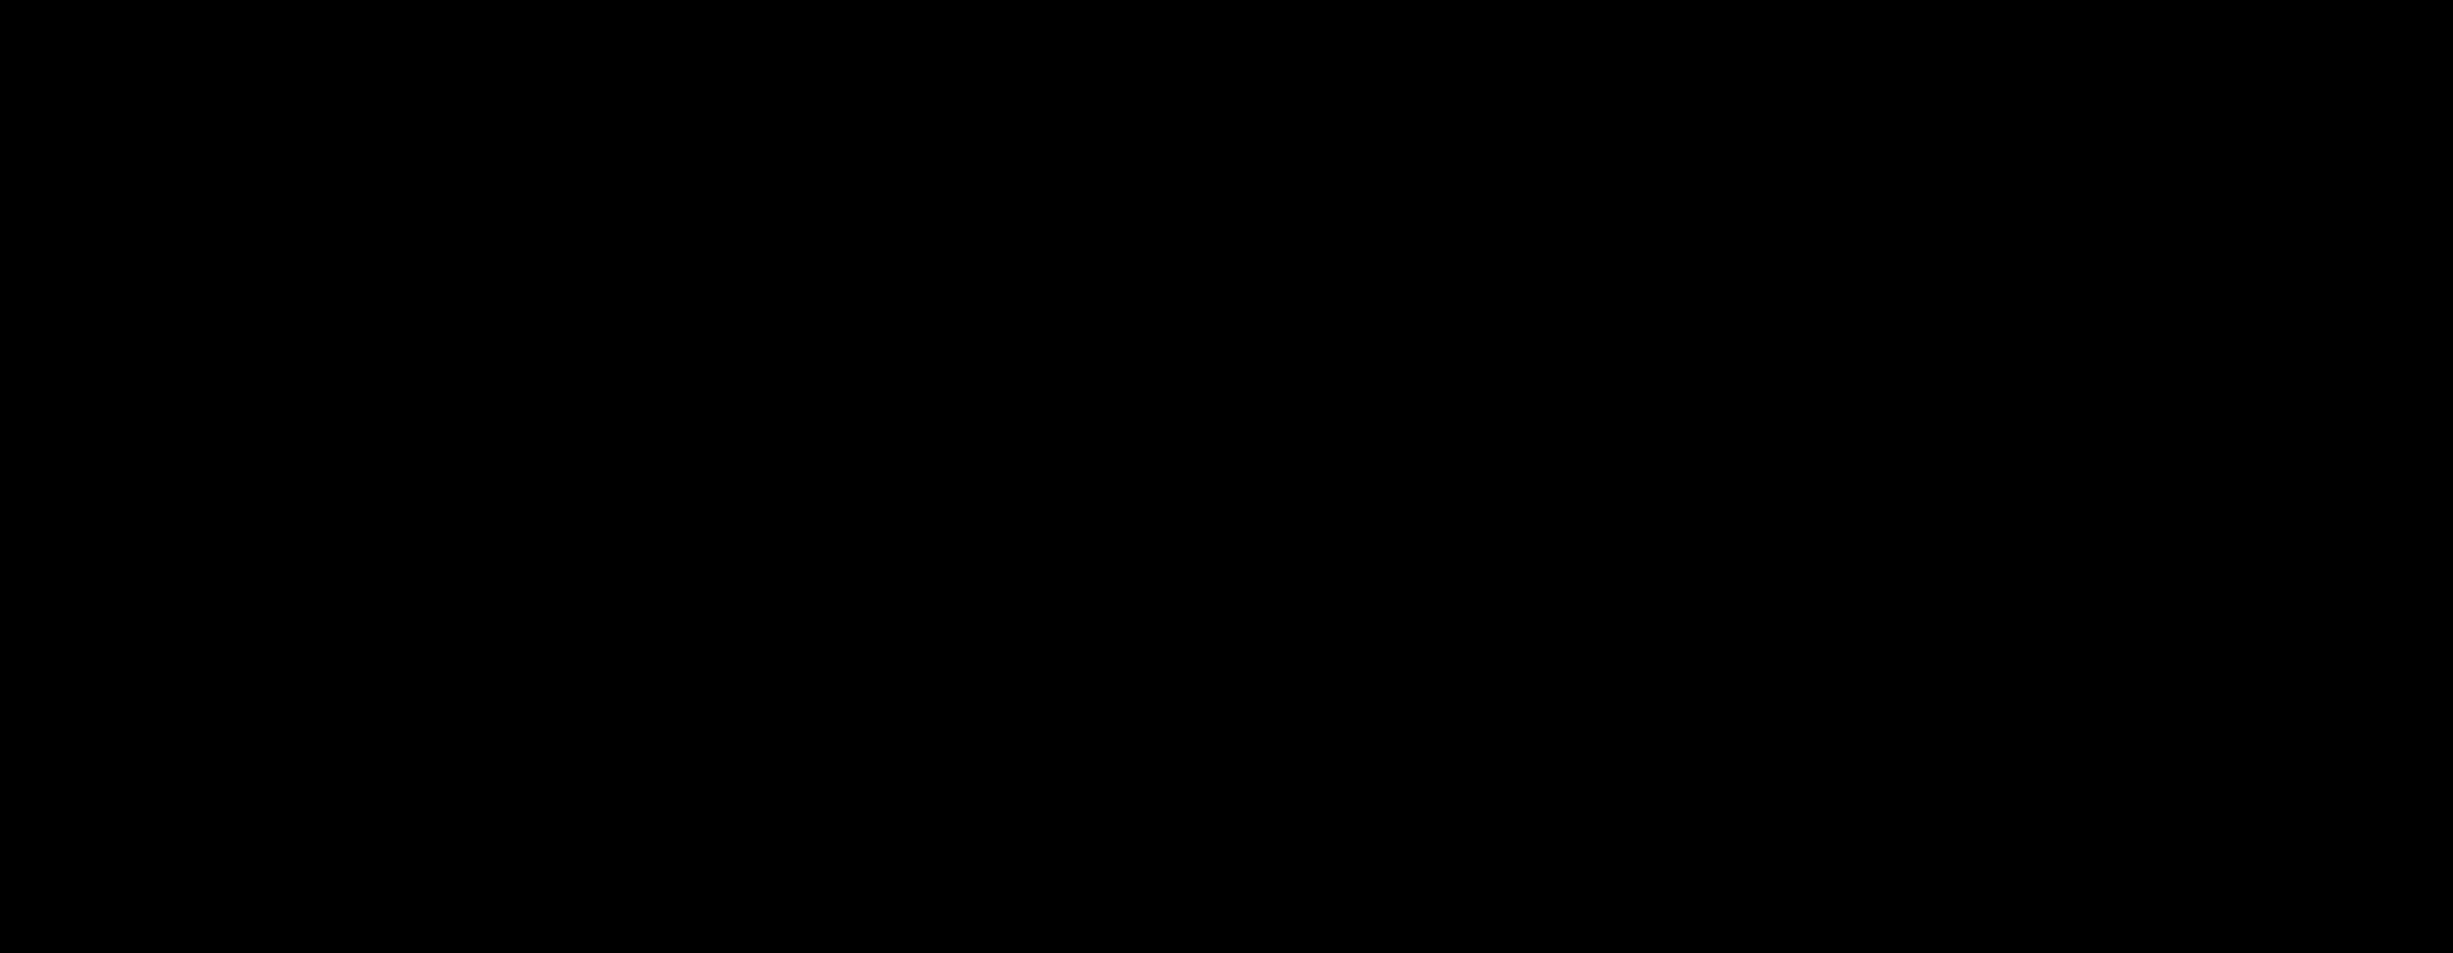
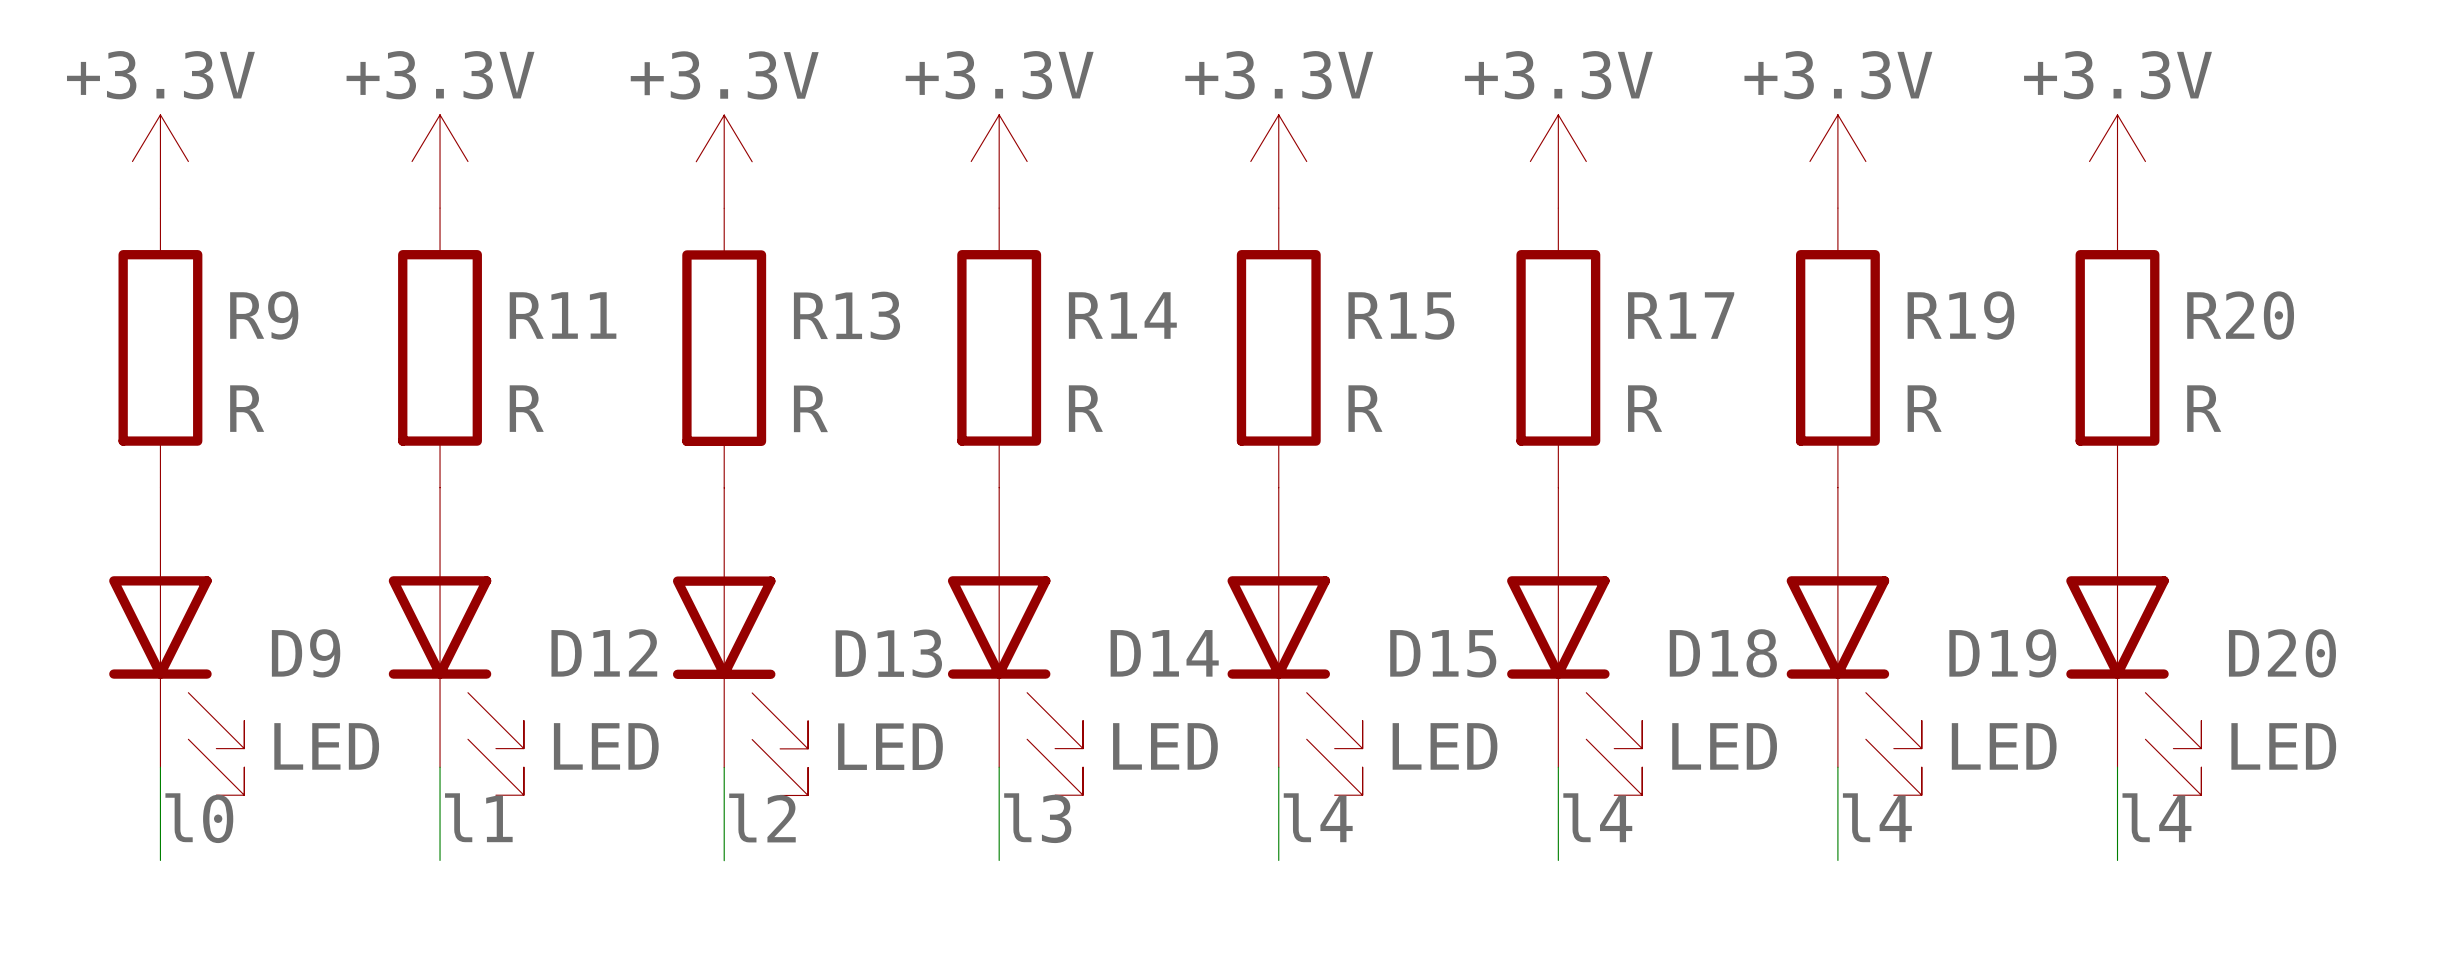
power symbol: none -> +3.3V (160, 161)
power symbol: none -> +3.3V (440, 161)
power symbol: none -> +3.3V (724, 161)
power symbol: none -> +3.3V (999, 161)
power symbol: none -> +3.3V (1278, 161)
power symbol: none -> +3.3V (1558, 161)
power symbol: none -> +3.3V (1837, 161)
power symbol: none -> +3.3V (2117, 161)
R9: none -> R (160, 347)
R11: none -> R (440, 347)
R14: none -> R (999, 347)
R15: none -> R (1278, 347)
R17: none -> R (1558, 347)
R19: none -> R (1837, 347)
R20: none -> R (2117, 347)
R13: none -> R (724, 348)
D9: none -> LED (176, 641)
D12: none -> LED (456, 641)
D13: none -> LED (740, 641)
D14: none -> LED (1015, 641)
D15: none -> LED (1295, 641)
D18: none -> LED (1574, 641)
D19: none -> LED (1854, 641)
D20: none -> LED (2133, 641)
wire: none -> (160, 767) (160, 860)
wire: none -> (440, 767) (440, 860)
wire: none -> (724, 767) (724, 860)
wire: none -> (999, 767) (999, 860)
wire: none -> (1278, 767) (1278, 860)
wire: none -> (1558, 767) (1558, 860)
wire: none -> (1837, 767) (1837, 860)
wire: none -> (2117, 767) (2117, 860)
label: none -> l4 (1318, 817)
label: none -> l4 (1597, 817)
label: none -> l4 (1877, 817)
label: none -> l4 (2156, 817)
label: none -> l0 (199, 818)
label: none -> l1 (478, 817)
label: none -> l3 (1037, 818)
label: none -> l2 (762, 817)

